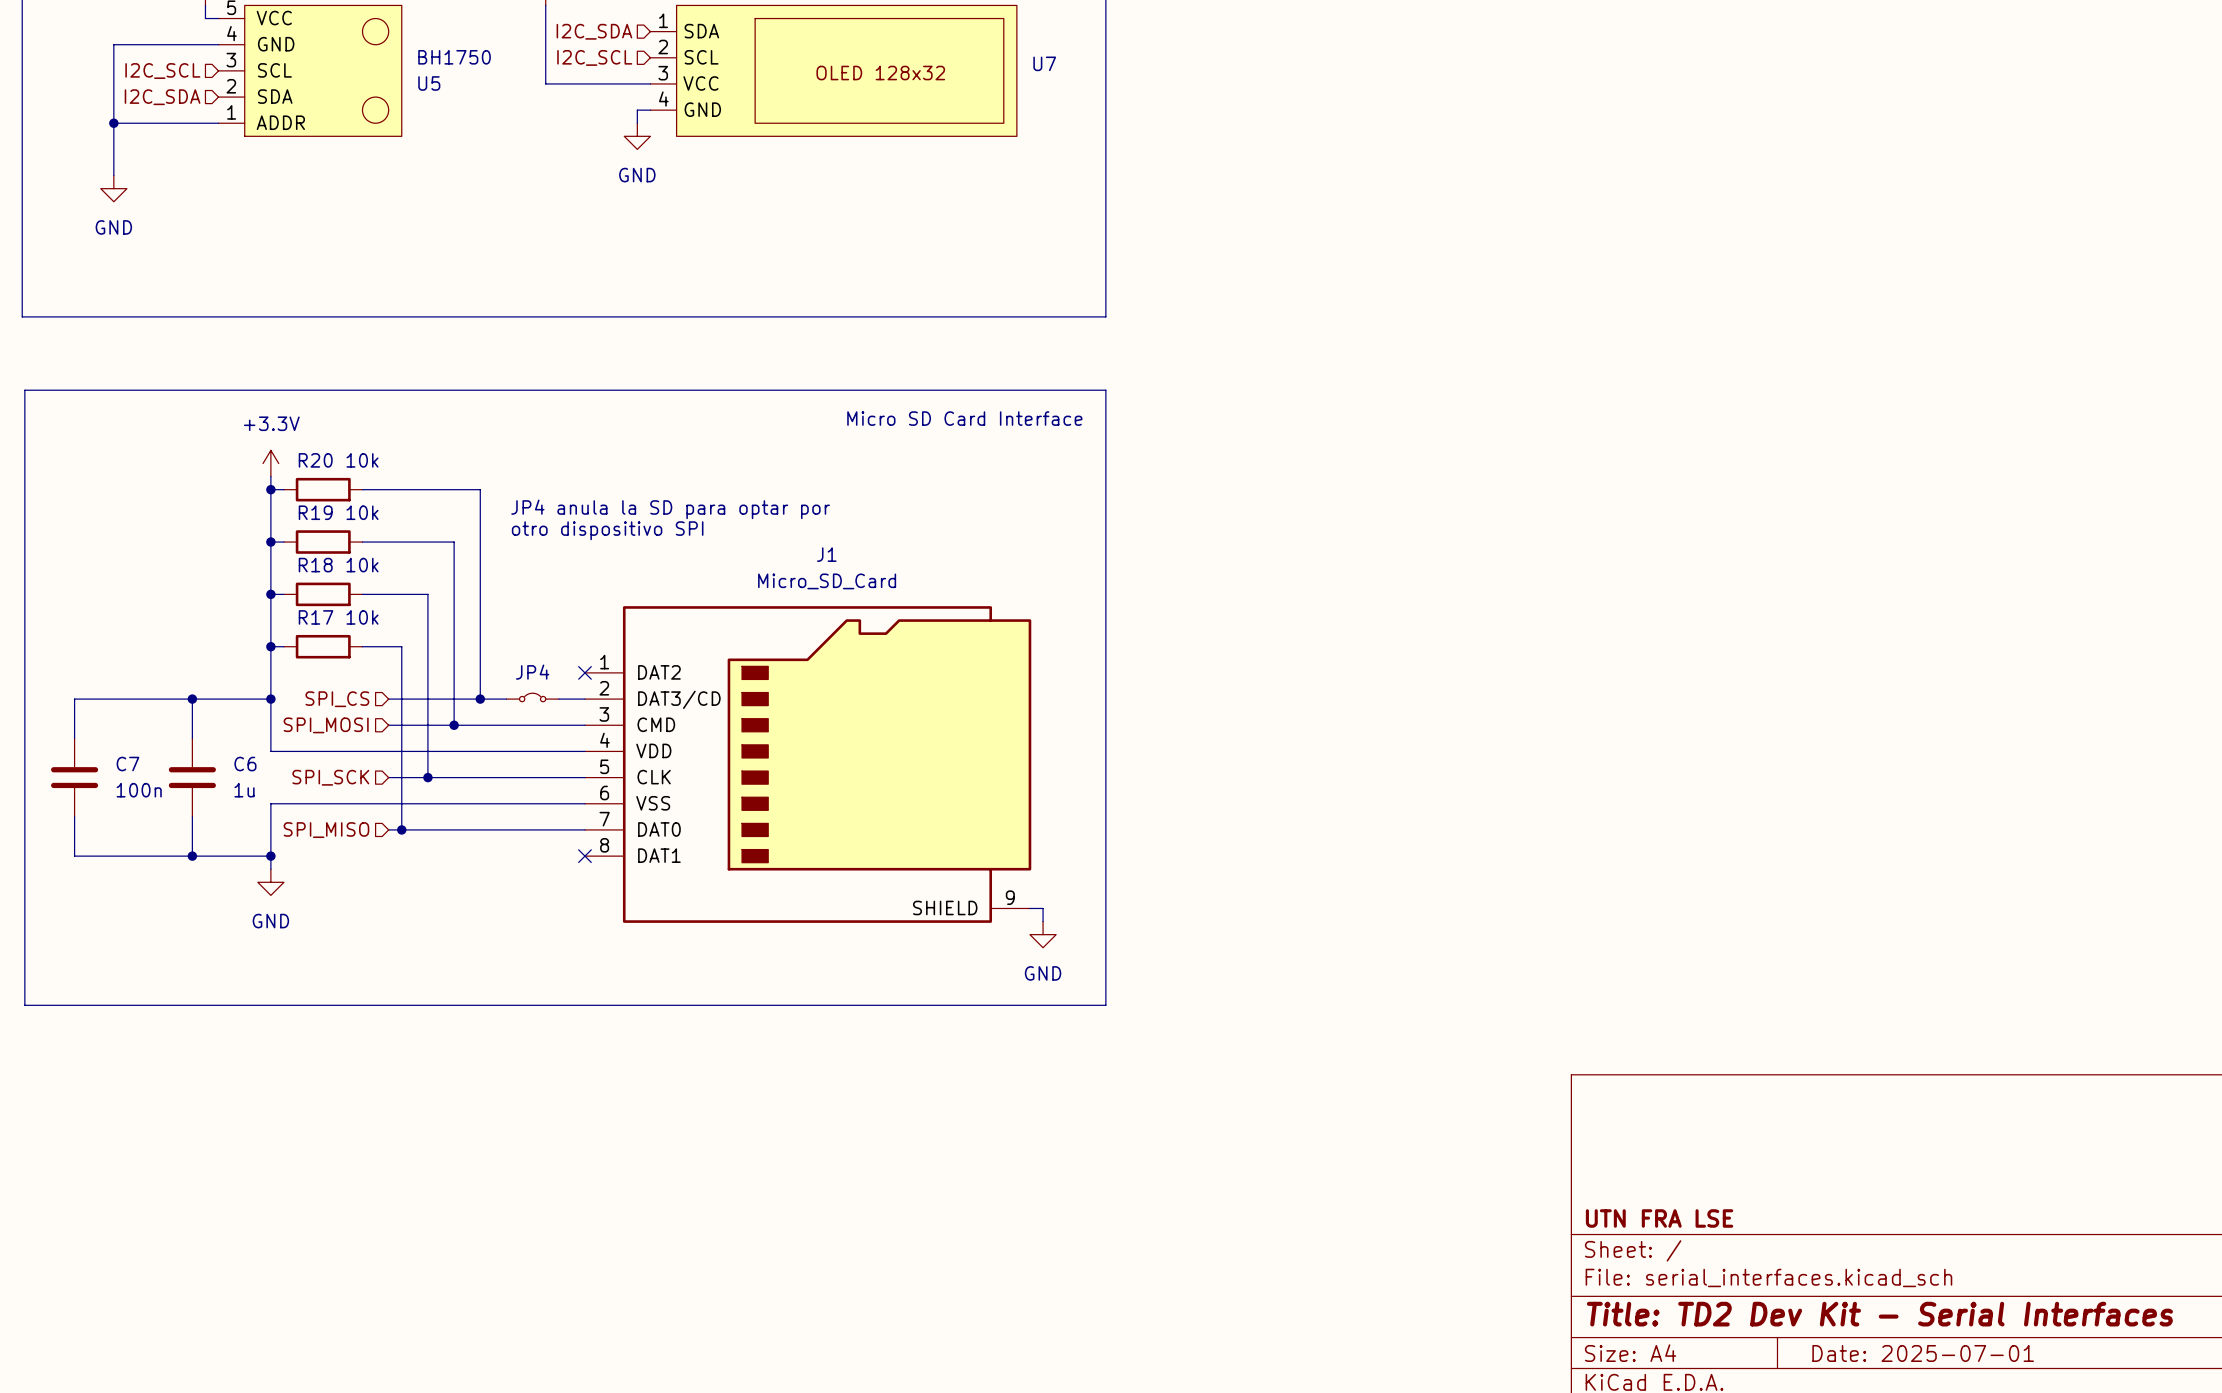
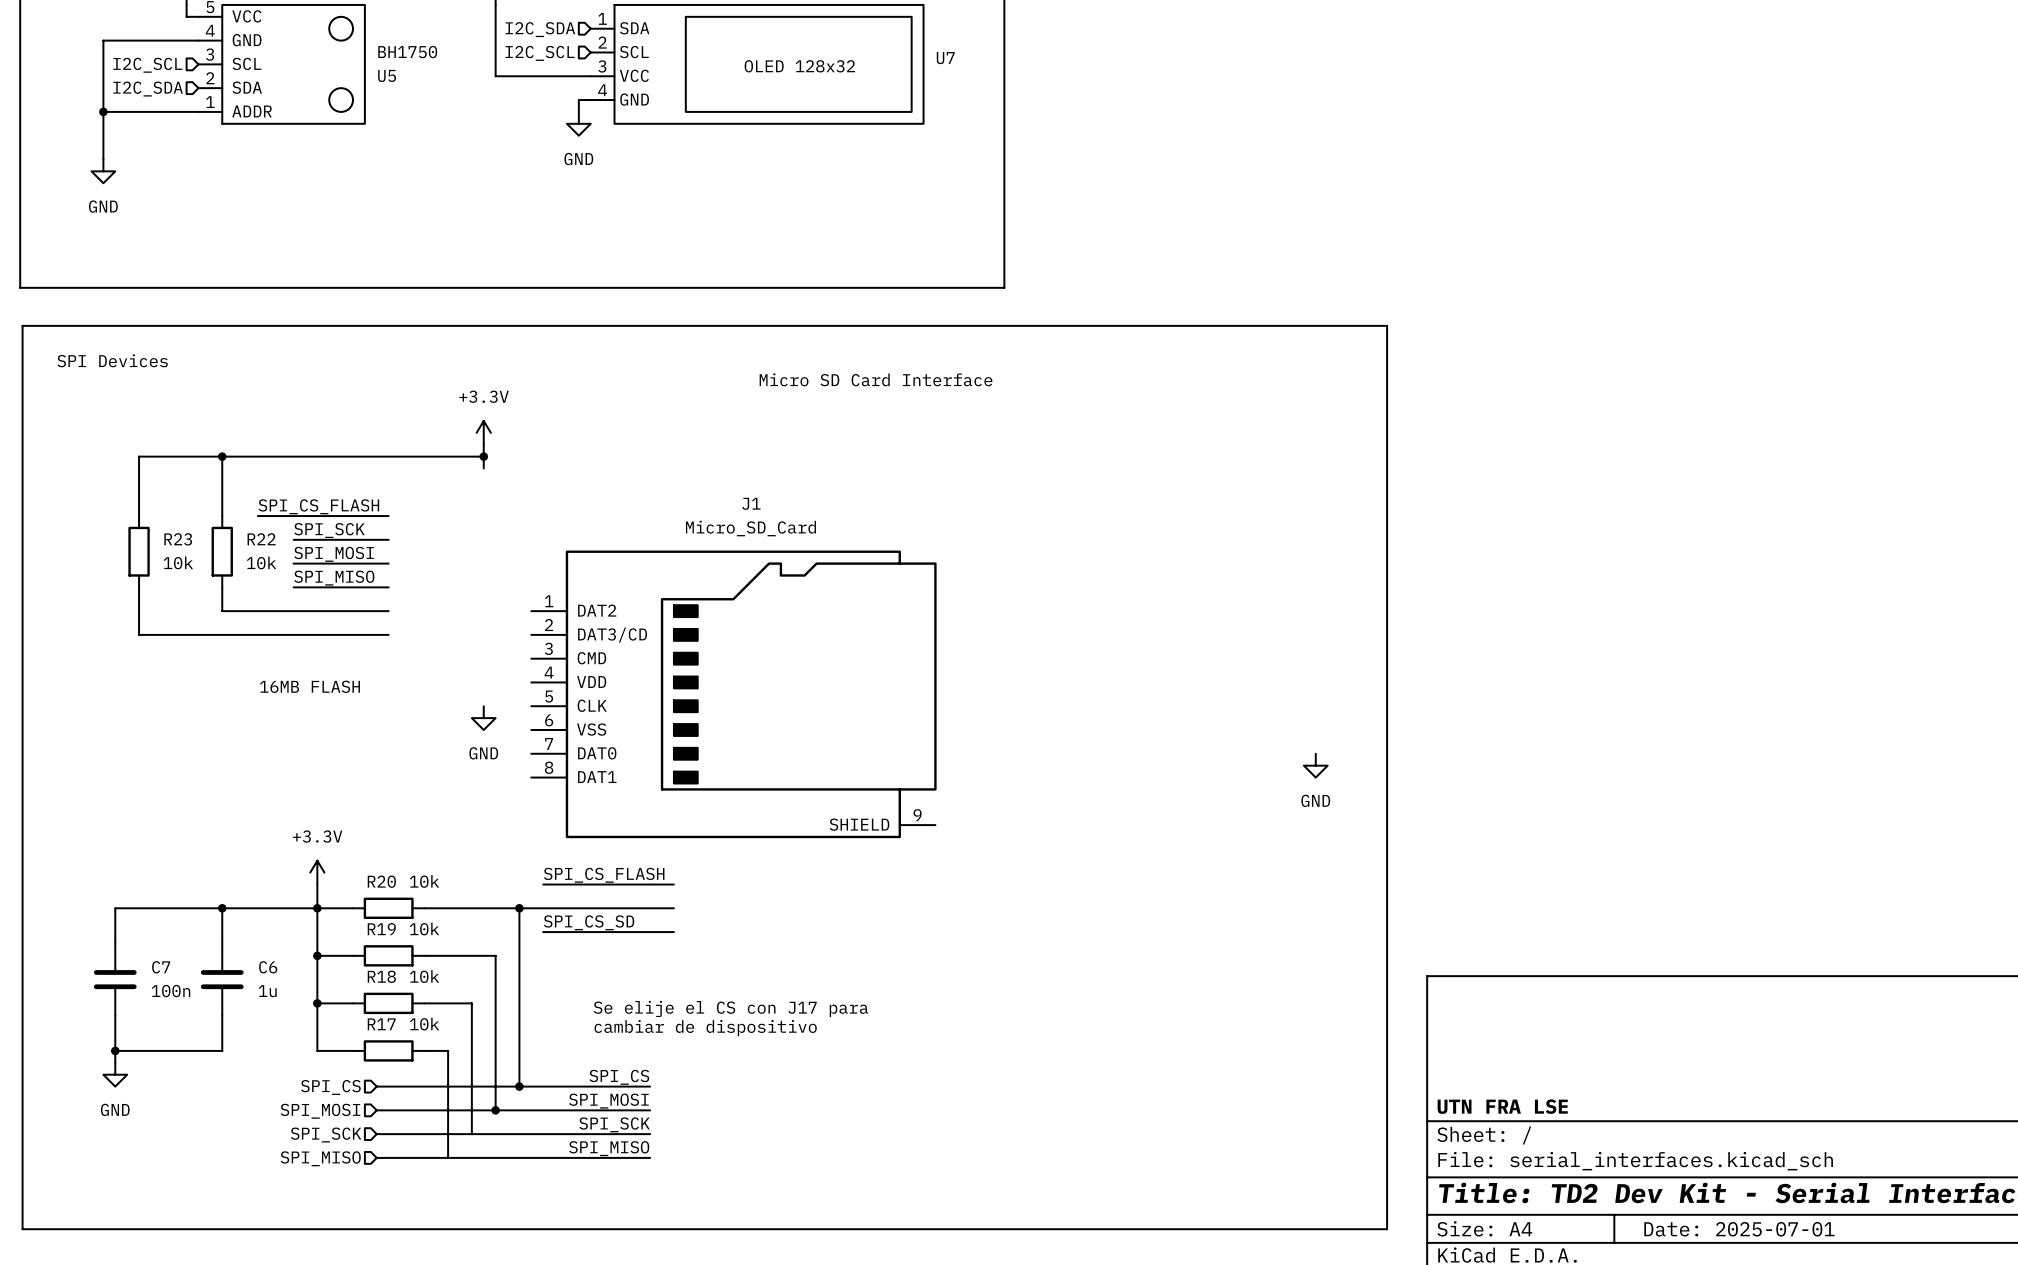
line: (24, 390) (1105, 390) (1105, 1005) (24, 1005) -> (22, 354) (22, 325) (1387, 325) (1387, 1229) (22, 1229) (22, 913)
text: none -> SPI Devices (112, 360)
power symbol: +3.3V (270, 463) -> none
wire: (270, 476) (270, 751) (584, 751) -> none
power symbol: none -> +3.3V (483, 432)
wire: (270, 489) (283, 489) -> none
junction: (270, 489) -> none
R20 position: (323, 489) -> (388, 908)
wire: (362, 489) (480, 489) (480, 699) -> none
wire: none -> (483, 444) (483, 468)
wire: none -> (222, 456) (222, 516)
junction: none -> (222, 456)
wire: none -> (483, 456) (139, 456) (139, 516)
junction: none -> (483, 456)
text: JP4 anula la SD para optar por (670, 509) -> none
text: otro dispositivo SPI (607, 530) -> none
wire: (270, 542) (283, 542) -> none
junction: (270, 542) -> none
R19 position: (323, 542) -> (388, 955)
wire: (362, 542) (454, 542) (454, 725) -> none
label: none -> SPI_CS_FLASH (318, 506)
wire: none -> (257, 516) (388, 516)
label: none -> SPI_SCK (329, 530)
wire: (270, 594) (283, 594) -> none
junction: (270, 594) -> none
wire: none -> (293, 539) (329, 539)
R18 position: (323, 594) -> (388, 1003)
wire: (427, 594) (427, 777) -> none
R23: none -> 10k (139, 551)
R22: none -> 10k (222, 551)
label: none -> SPI_MOSI (334, 554)
wire: none -> (293, 563) (388, 563)
label: none -> SPI_MISO (334, 578)
wire: none -> (222, 587) (222, 611) (388, 611)
wire: (270, 646) (283, 646) -> none
junction: (270, 646) -> none
wire: none -> (293, 587) (329, 587)
R17 position: (323, 646) -> (388, 1050)
wire: (401, 646) (401, 829) -> (364, 587) (388, 587)
no-connect mark: (584, 672) -> none
JP4: (532, 697) -> none
wire: (153, 699) (74, 699) (74, 738) -> (139, 634) (139, 587)
wire: (192, 699) (192, 738) -> none
junction: (192, 699) -> none
wire: none -> (246, 634) (353, 634)
junction: (270, 699) -> none
hierarchical label: SPI_CS (337, 699) -> none
wire: (427, 699) (506, 699) -> none
junction: (480, 699) -> none
wire: (558, 699) (584, 699) -> none
hierarchical label: SPI_MOSI (326, 725) -> none
wire: (388, 725) (584, 725) -> none
junction: (454, 725) -> none
text: none -> 16MB FLASH (309, 686)
C7 position: (74, 777) -> (115, 979)
C6 position: (192, 777) -> (222, 979)
hierarchical label: SPI_SCK (330, 777) -> none
wire: (388, 777) (584, 777) -> none
junction: (427, 777) -> none
power symbol: none -> GND (483, 718)
wire: (584, 803) (270, 803) (270, 869) -> none
wire: (74, 816) (74, 856) (270, 856) -> none
wire: (192, 816) (192, 856) -> (222, 908) (222, 943)
wire: (388, 829) (584, 829) -> none
junction: (401, 829) -> none
hierarchical label: SPI_MISO (326, 830) -> none
power symbol: none -> GND (1315, 765)
junction: (192, 856) -> none
junction: (270, 856) -> none
no-connect mark: (584, 856) -> none
power symbol: GND (270, 882) -> none
wire: (1029, 908) (1043, 908) (1043, 921) -> none
power symbol: GND (1043, 934) -> none
power symbol: none -> +3.3V (317, 872)
label: none -> SPI_CS_FLASH (604, 875)
wire: none -> (317, 884) (317, 1050) (353, 1050)
wire: none -> (543, 884) (673, 884)
junction: none -> (222, 908)
junction: none -> (317, 908)
wire: none -> (353, 908) (115, 908) (115, 943)
wire: none -> (424, 908) (673, 908)
wire: none -> (519, 908) (519, 1086)
junction: none -> (519, 908)
label: none -> SPI_CS_SD (589, 922)
wire: none -> (543, 932) (673, 932)
wire: none -> (317, 955) (353, 955)
junction: none -> (317, 955)
wire: none -> (424, 955) (495, 955) (495, 1110)
wire: none -> (317, 1003) (353, 1003)
junction: none -> (317, 1003)
wire: none -> (424, 1003) (471, 1003) (471, 1134)
text: none -> Se elije el CS con J17 para (731, 1008)
wire: none -> (115, 1015) (115, 1062)
wire: none -> (222, 1015) (222, 1050) (115, 1050)
text: none -> cambiar de dispositivo (705, 1028)
junction: none -> (115, 1050)
wire: none -> (424, 1050) (448, 1050) (448, 1157)
power symbol: none -> GND (115, 1074)
label: none -> SPI_CS (619, 1077)
hierarchical label: none -> SPI_CS (330, 1087)
wire: none -> (376, 1086) (650, 1086)
junction: none -> (519, 1086)
label: none -> SPI_MOSI (608, 1101)
hierarchical label: none -> SPI_MOSI (320, 1111)
wire: none -> (376, 1110) (650, 1110)
junction: none -> (495, 1110)
label: none -> SPI_SCK (614, 1124)
hierarchical label: none -> SPI_SCK (326, 1135)
wire: none -> (376, 1134) (650, 1134)
label: none -> SPI_MISO (609, 1148)
wire: none -> (376, 1157) (650, 1157)
hierarchical label: none -> SPI_MISO (320, 1158)

